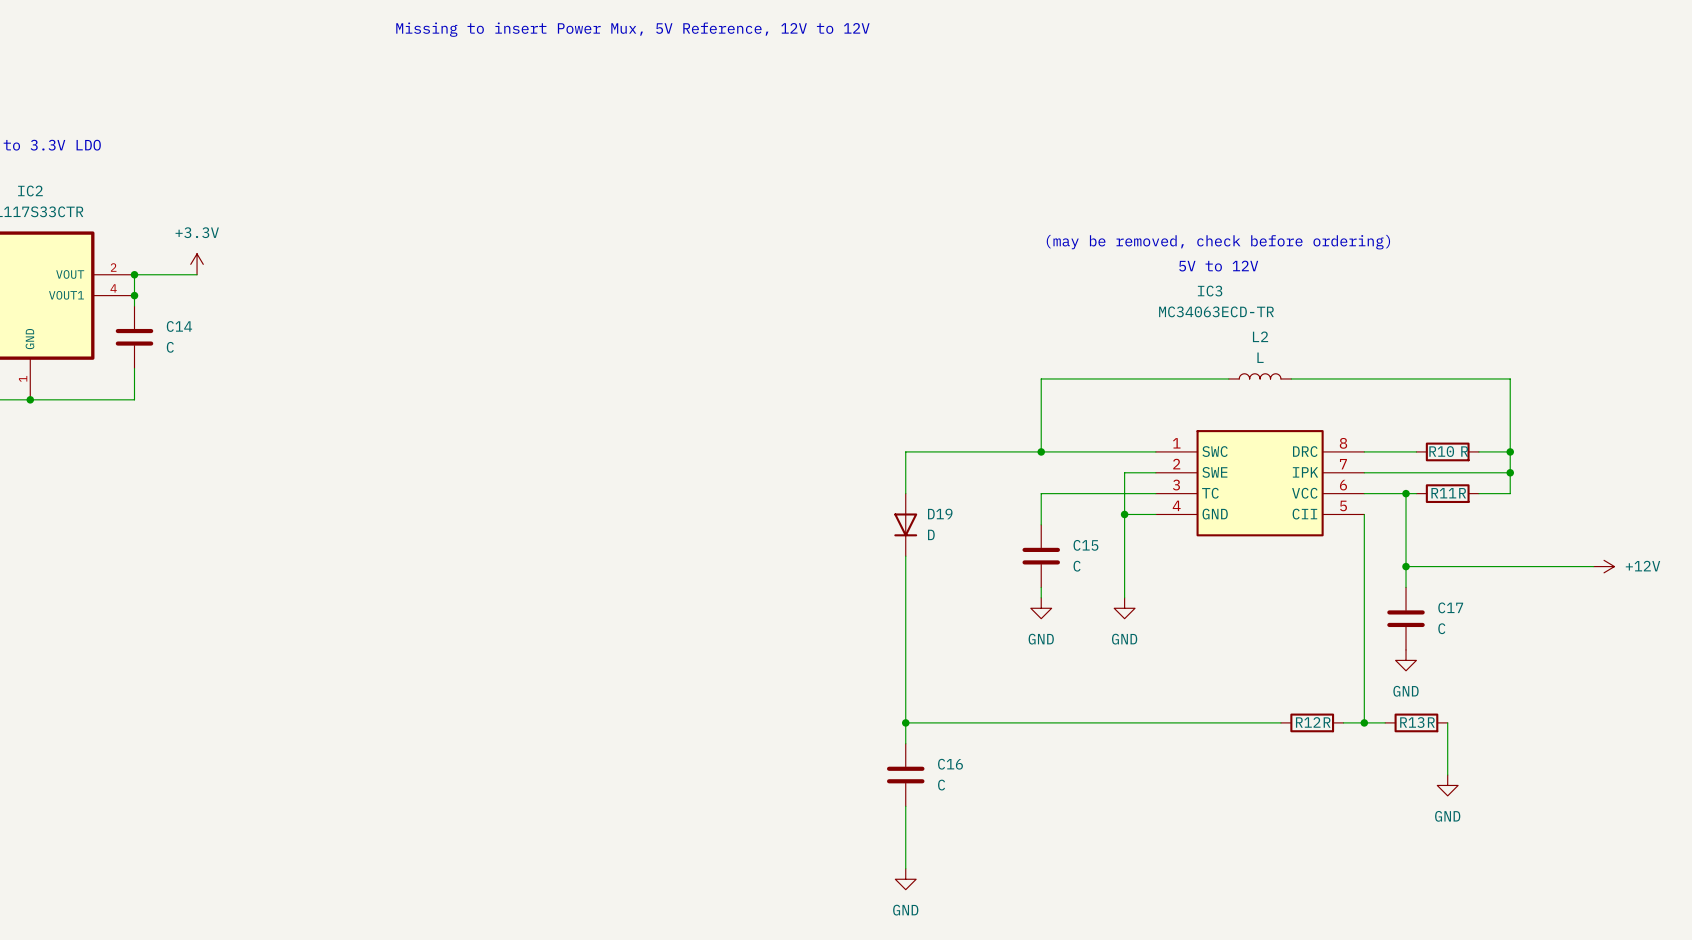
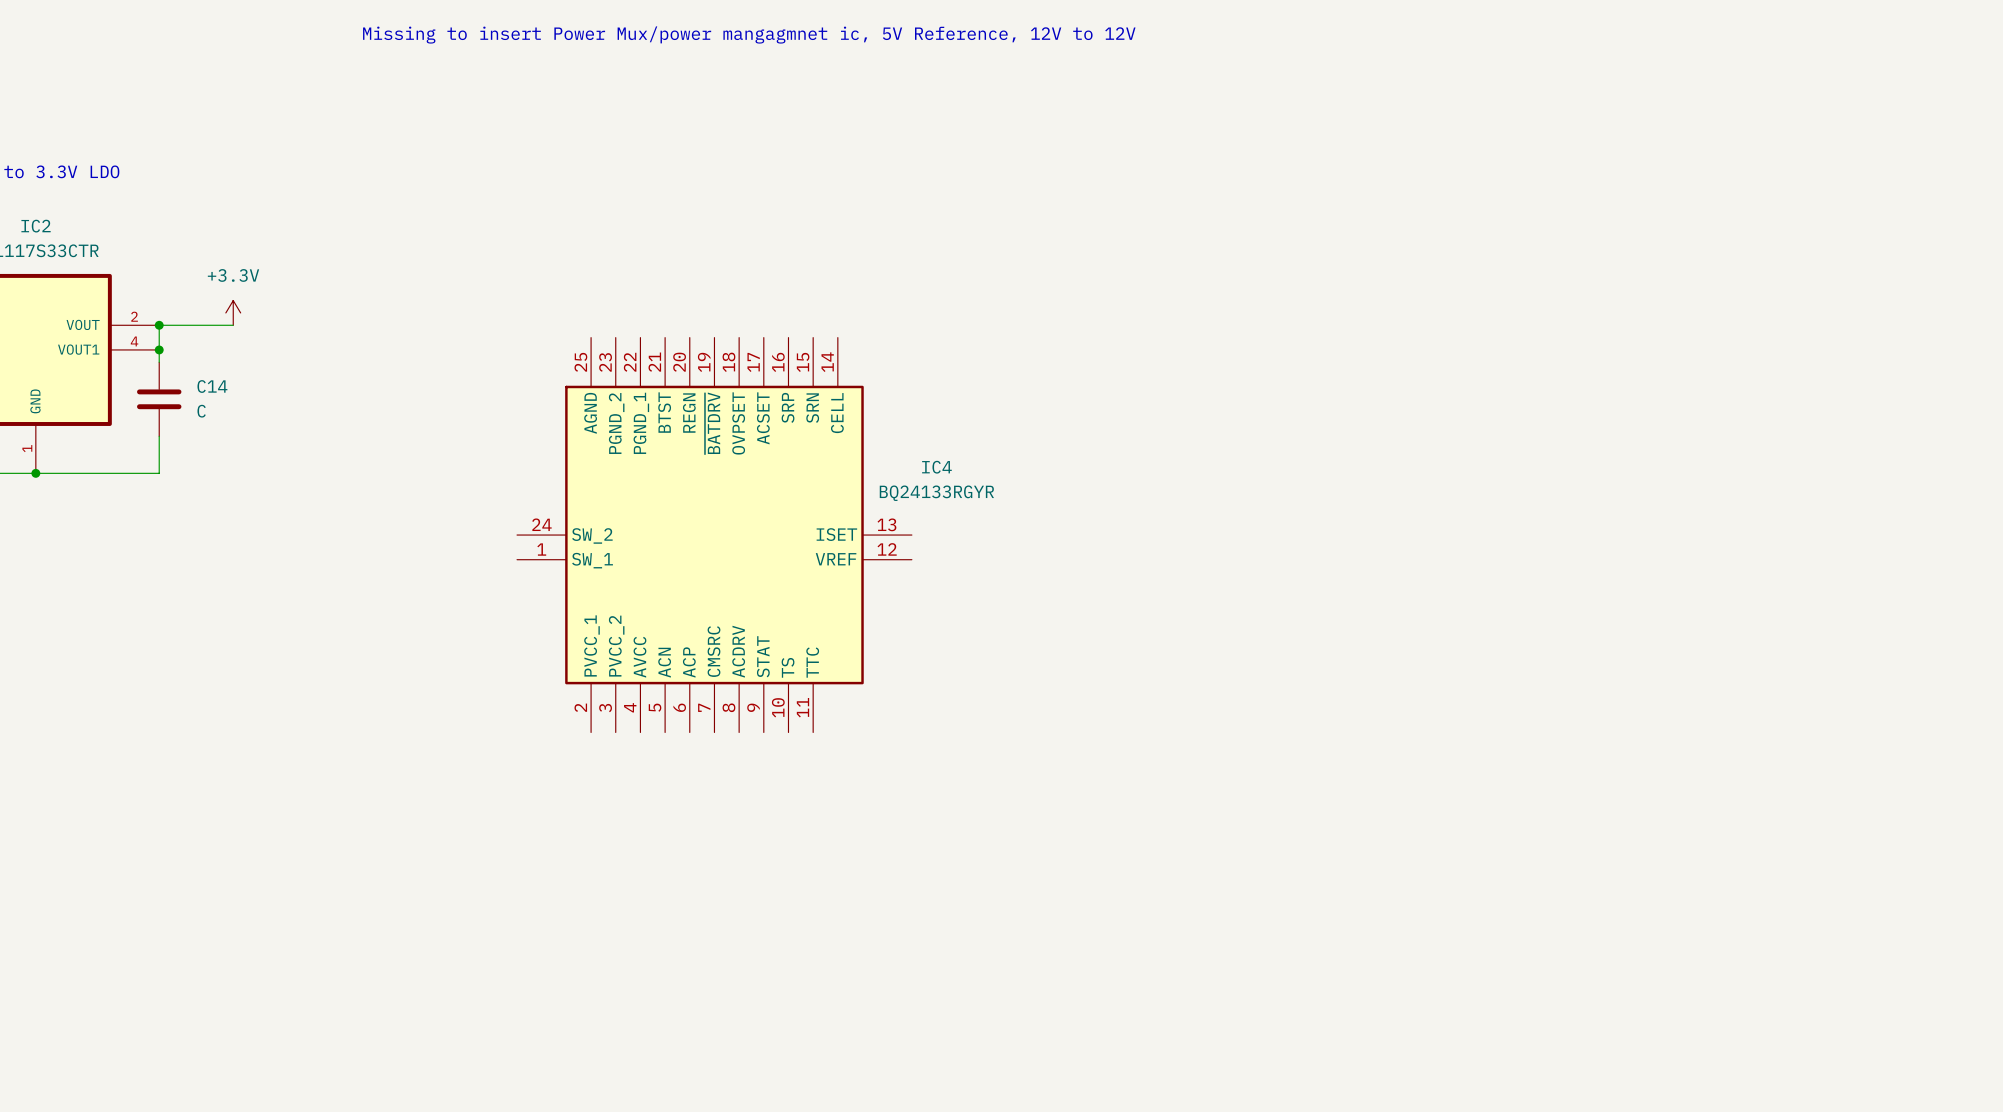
text: Missing to insert Power Mux, 5V Reference, 12V to 12V (632, 29) -> Missing to insert Power Mux/power mangagmnet ic, 5V Reference, 12V to 12V (749, 34)
text: (may be removed, check before ordering) (1218, 242) -> none
text: 5V to 12V (1218, 266) -> none
L2: L (1260, 376) -> none
wire: (1228, 378) (1041, 378) (1041, 451) -> none
wire: (1291, 378) (1510, 378) (1510, 493) (1478, 493) -> none
IC4: none -> BQ24133RGYR (714, 535)
junction: (1041, 451) -> none
wire: (1155, 451) (905, 451) (905, 493) -> none
wire: (1364, 451) (1416, 451) -> none
R10: R (1447, 451) -> none
wire: (1478, 451) (1510, 451) -> none
junction: (1510, 451) -> none
wire: (1155, 472) (1124, 472) (1124, 597) -> none
wire: (1364, 472) (1510, 472) -> none
junction: (1510, 472) -> none
IC3: MC34063ECD-TR (1260, 483) -> none
wire: (1155, 493) (1041, 493) (1041, 524) -> none
wire: (1364, 493) (1416, 493) -> none
wire: (1406, 493) (1406, 587) -> none
junction: (1406, 493) -> none
R11: R (1447, 493) -> none
wire: (1124, 514) (1155, 514) -> none
junction: (1124, 514) -> none
wire: (1364, 514) (1364, 722) -> none
D19: D (905, 524) -> none
wire: (905, 556) (905, 743) -> none
C15: C (1041, 556) -> none
wire: (1406, 566) (1593, 566) -> none
junction: (1406, 566) -> none
power symbol: +12V (1604, 566) -> none
wire: (1041, 587) (1041, 597) -> none
power symbol: GND (1041, 608) -> none
power symbol: GND (1124, 608) -> none
C17: C (1406, 618) -> none
power symbol: GND (1406, 660) -> none
wire: (905, 722) (1280, 722) -> none
junction: (905, 722) -> none
R12: R (1312, 722) -> none
wire: (1343, 722) (1385, 722) -> none
junction: (1364, 722) -> none
R13: R (1416, 722) -> none
wire: (1447, 722) (1447, 775) -> none
C16: C (905, 775) -> none
power symbol: GND (1447, 785) -> none
wire: (905, 806) (905, 868) -> none
power symbol: GND (905, 879) -> none

